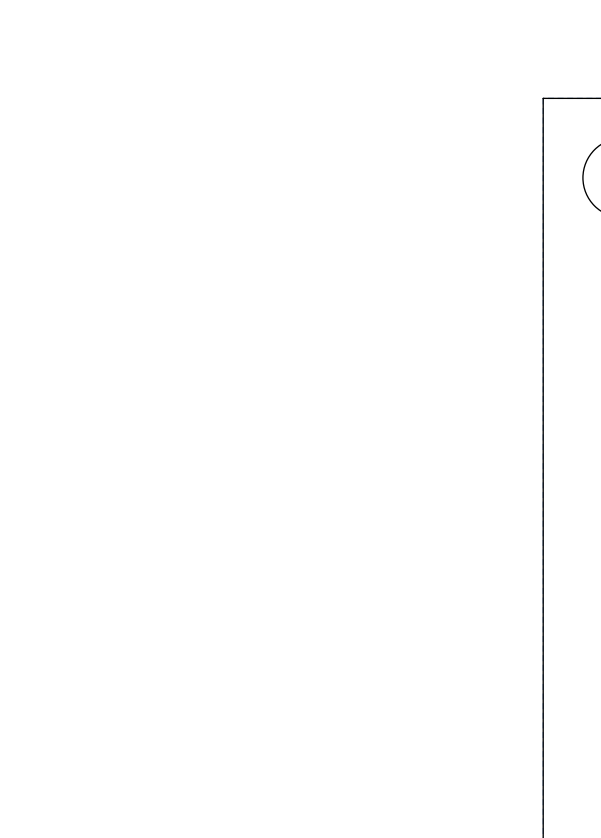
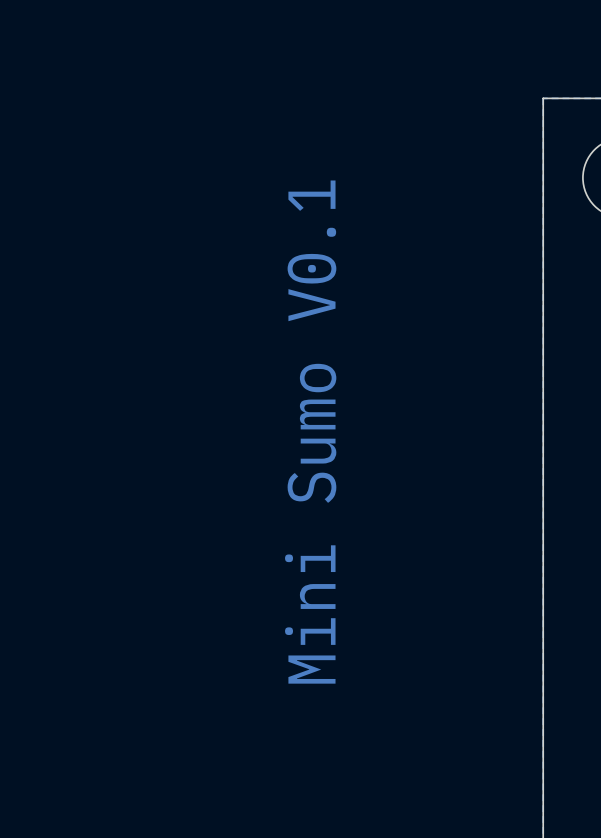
text: none -> Mini Sumo V0.1 (310, 432)

